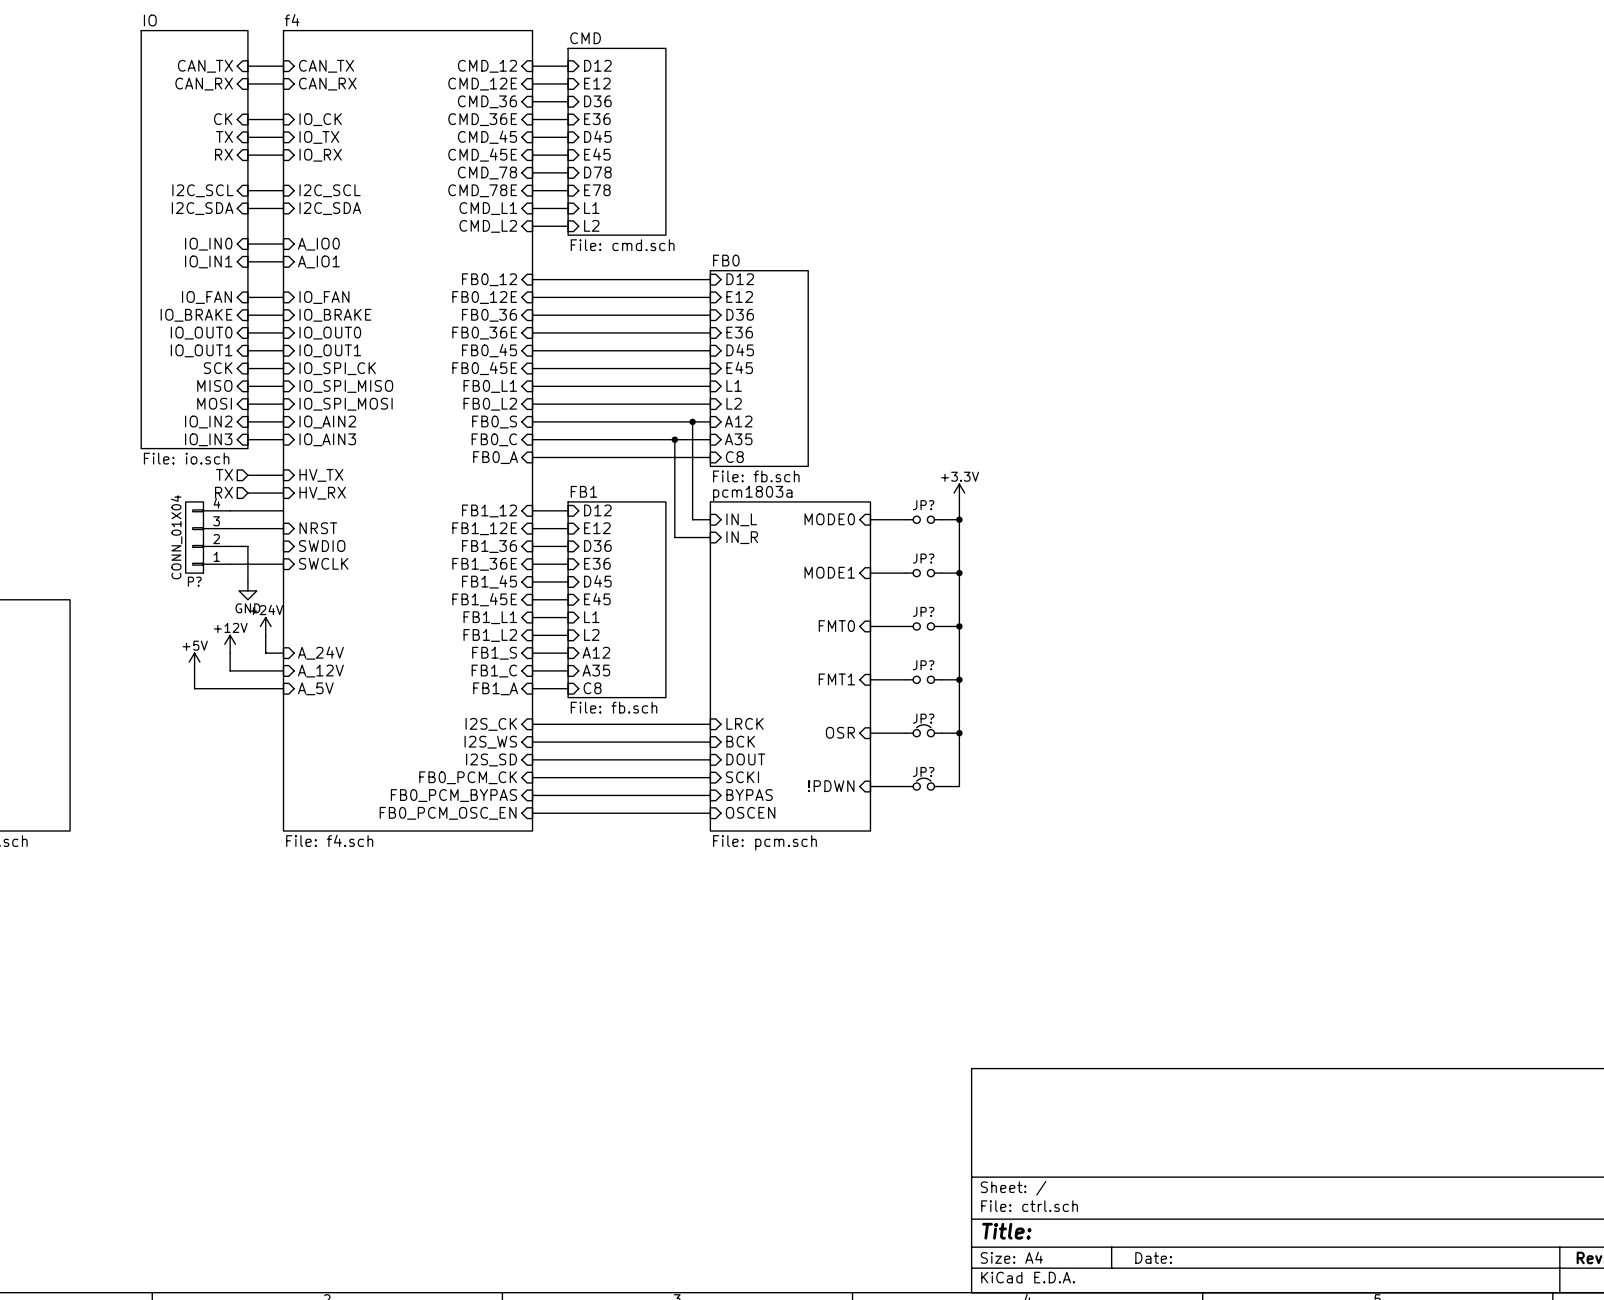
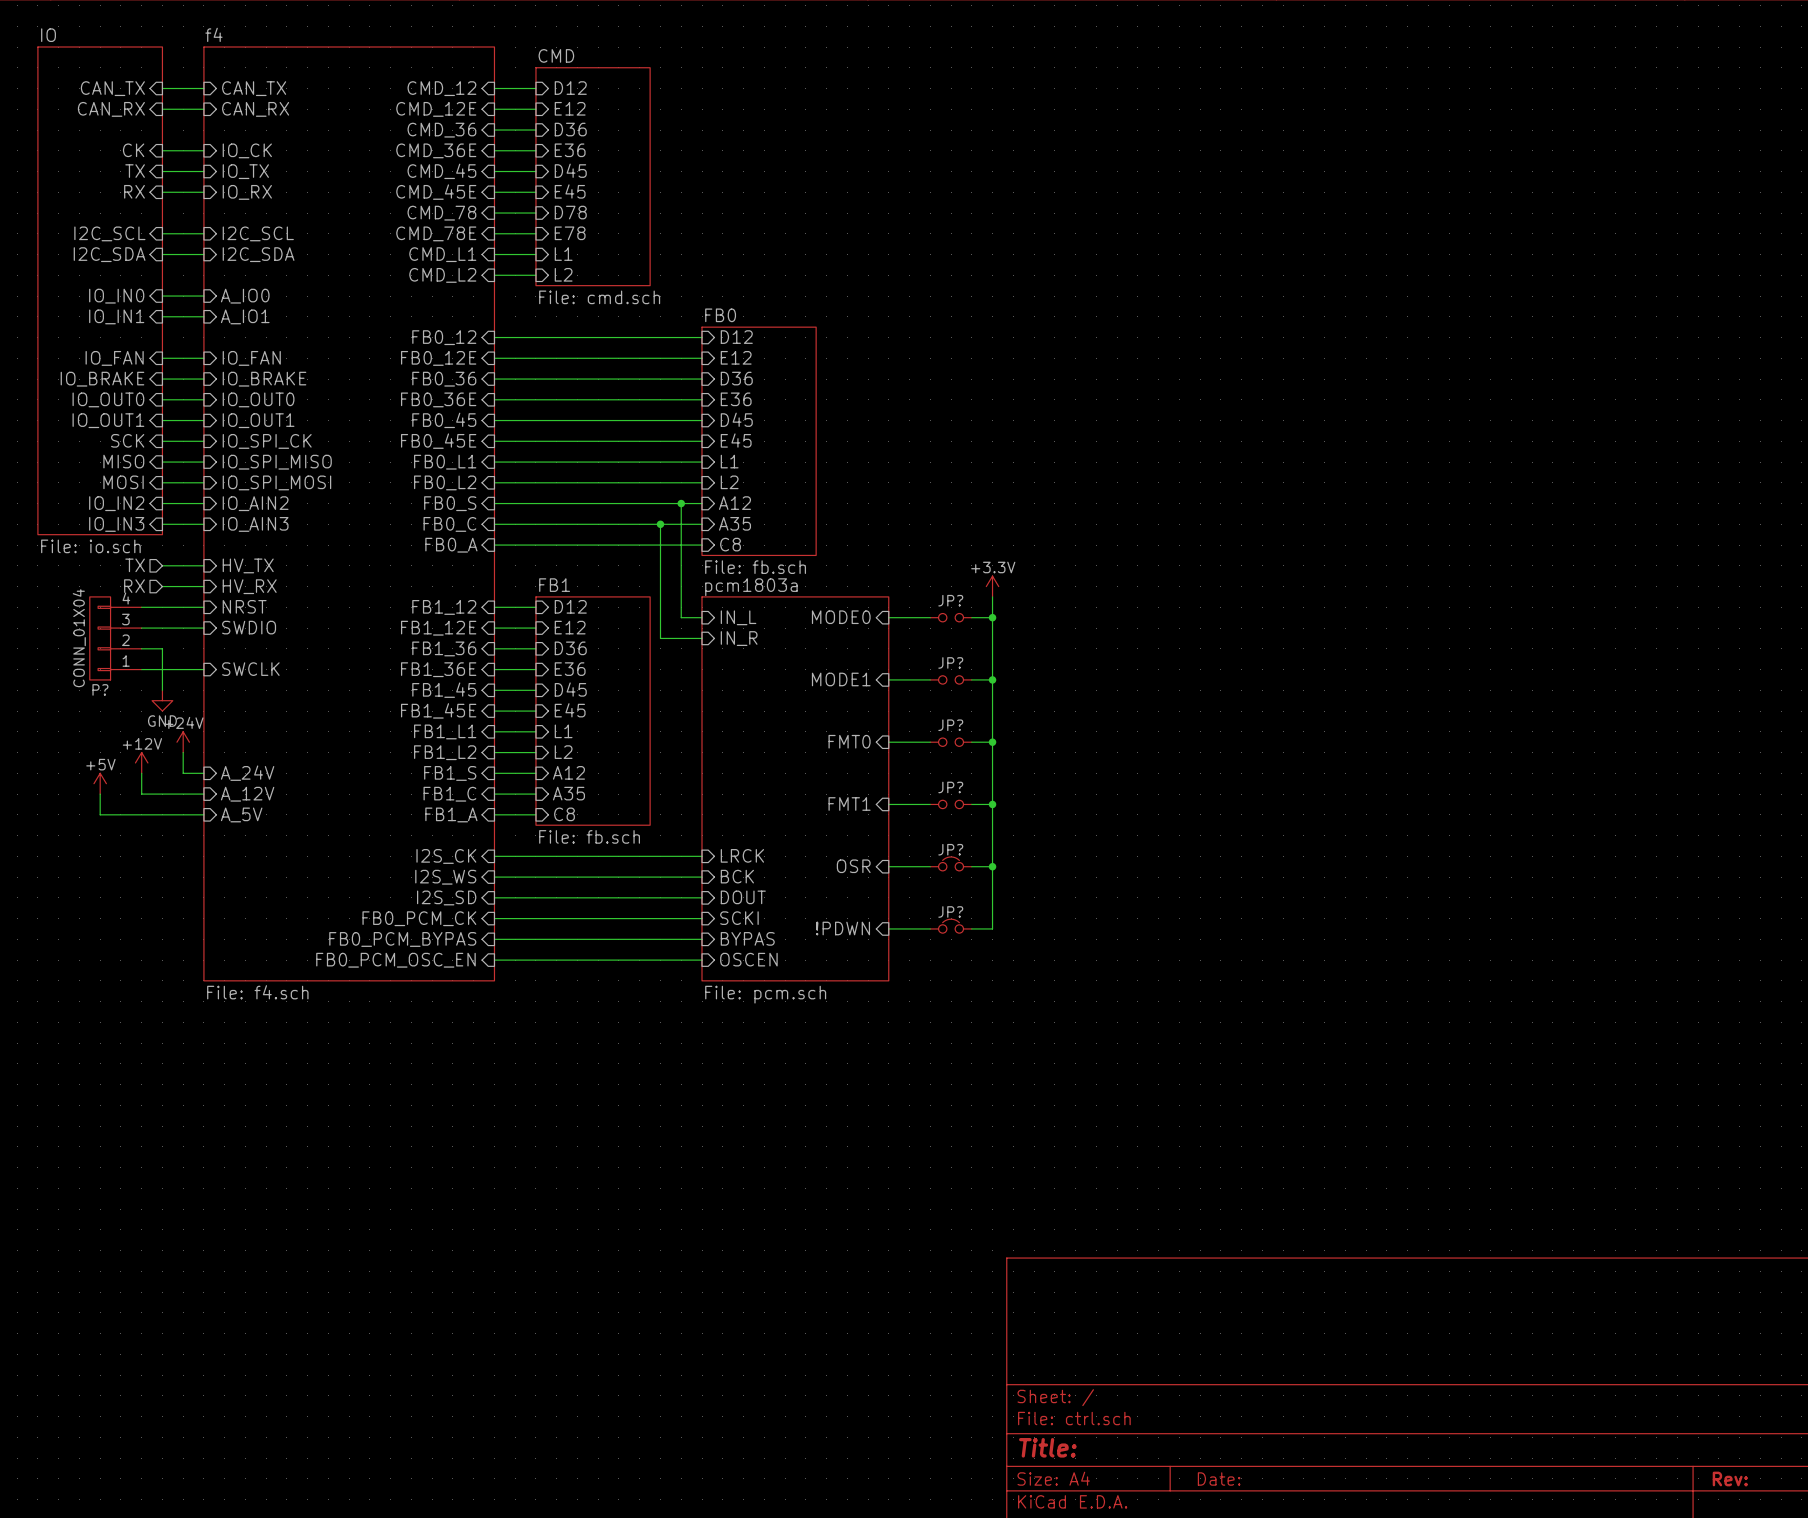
sheet pin: none -> NRST (244, 606)
sheet pin: NRST (318, 528) -> SWDIO (249, 627)
sheet pin: SWDIO (322, 546) -> none

